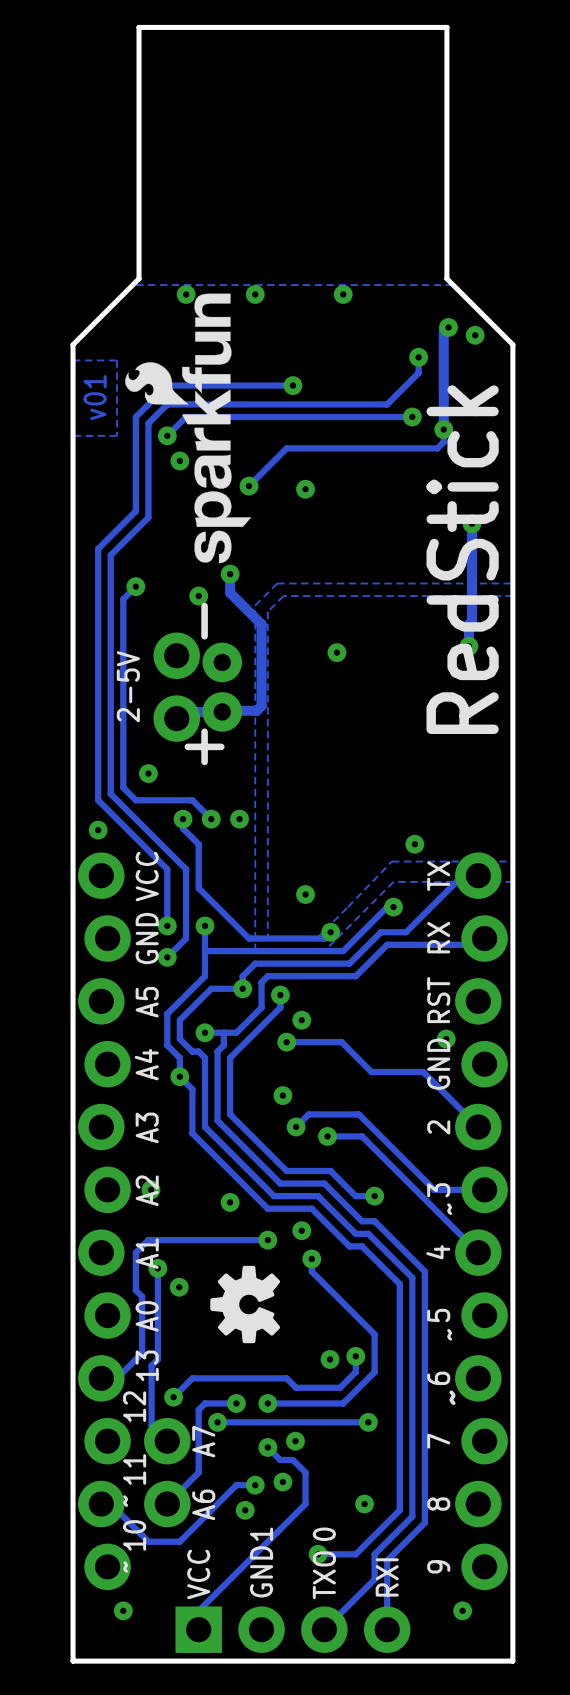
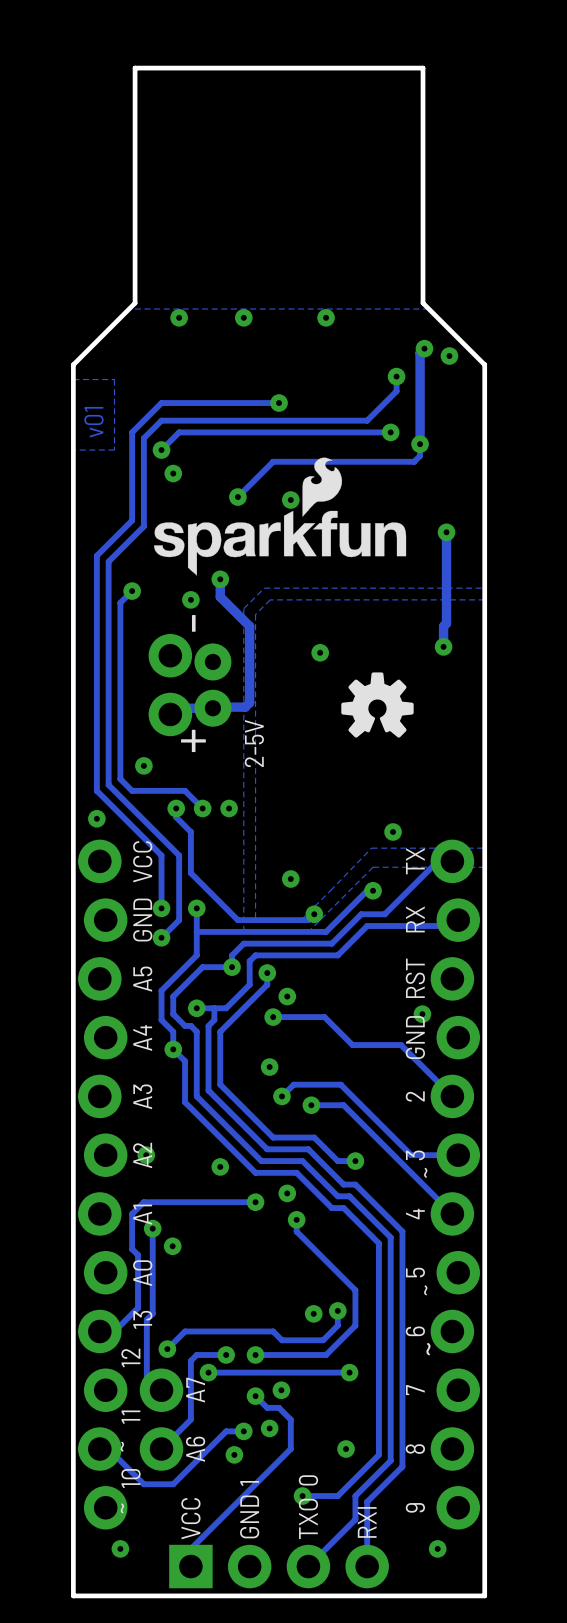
drawing: [125, 293, 252, 564] -> none
drawing: none -> [153, 457, 407, 576]
text: RedStick (462, 559) -> none
drawing: none -> [341, 672, 414, 738]
text position: 2-5V (128, 686) -> 2-5V (254, 743)
drawing: [210, 1265, 281, 1344] -> none

